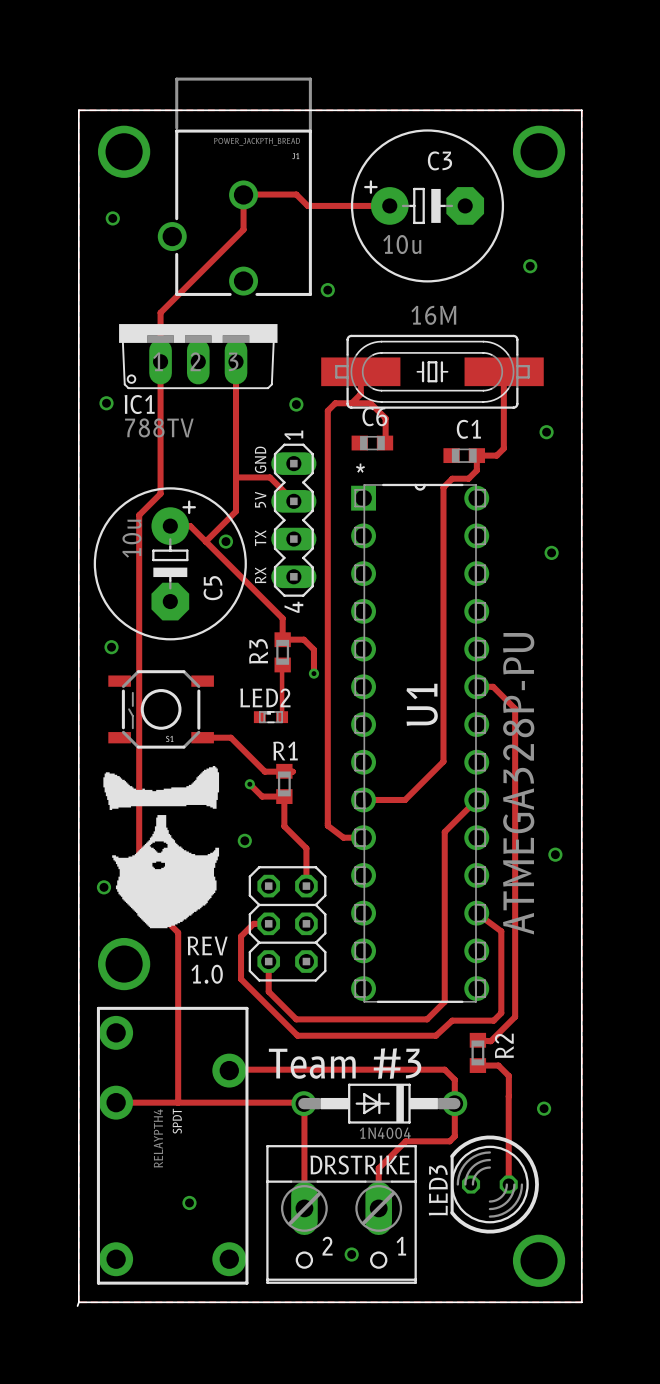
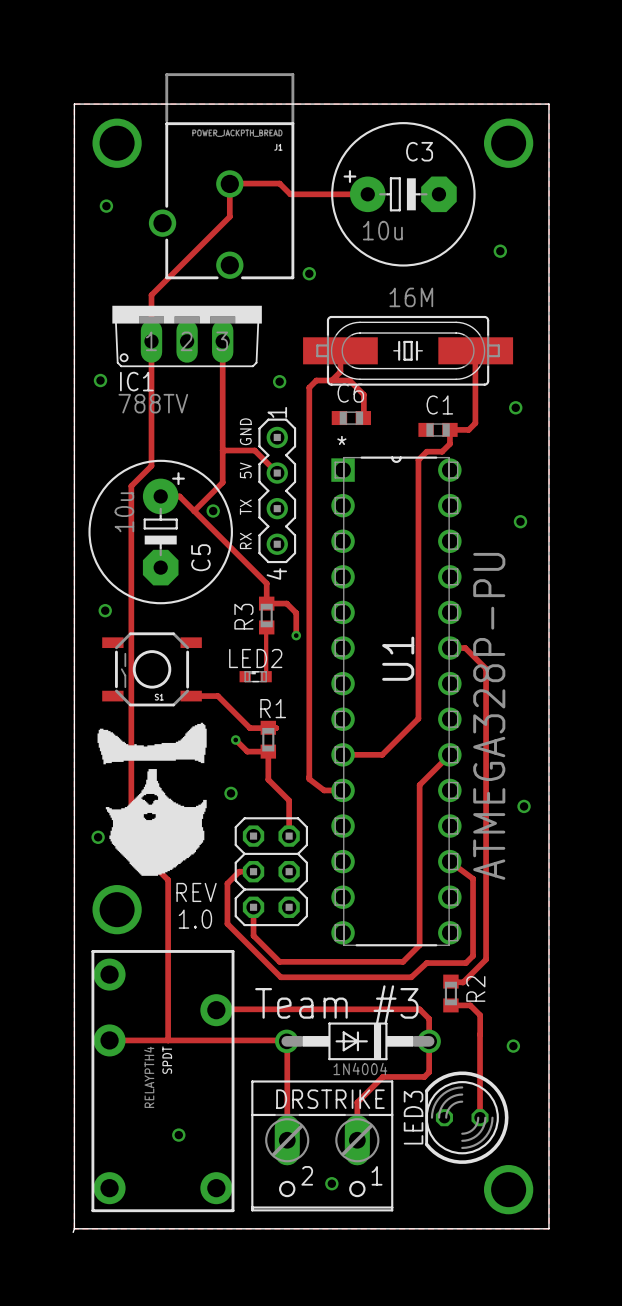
part footprint: [271, 443, 317, 597] -> [258, 418, 297, 564]

